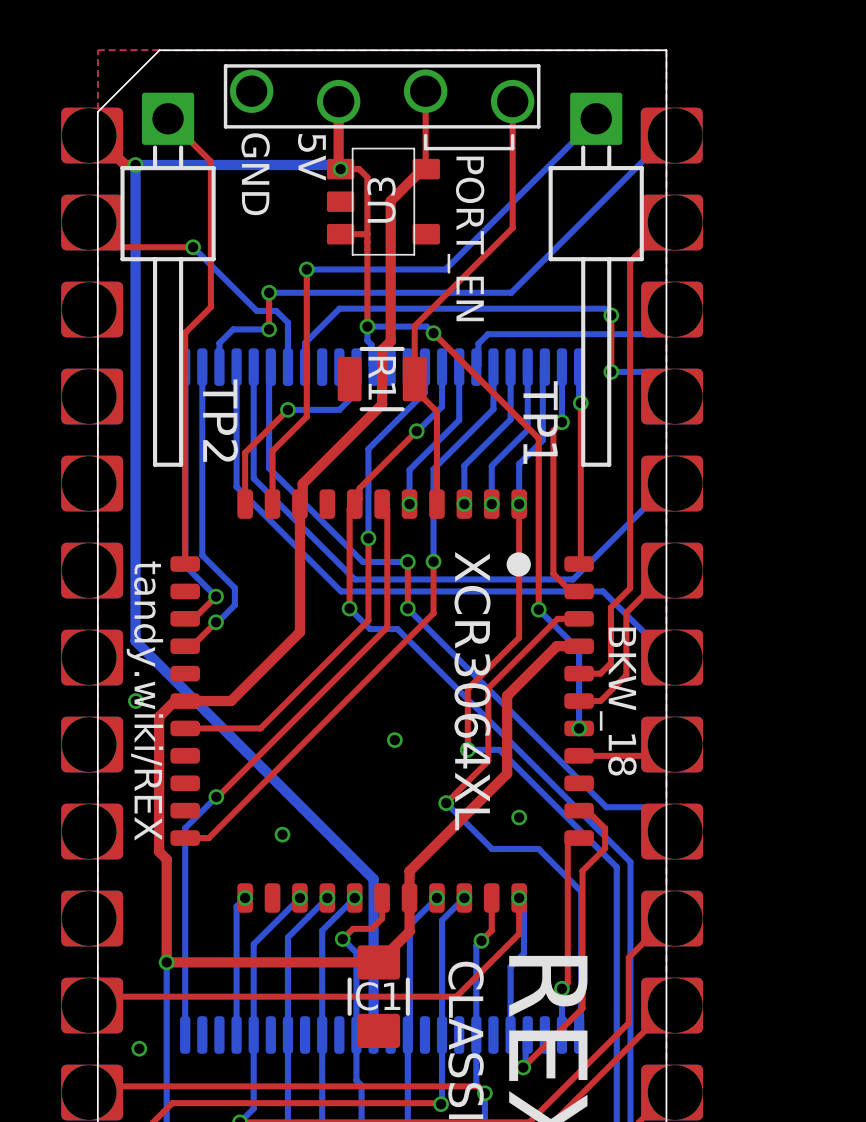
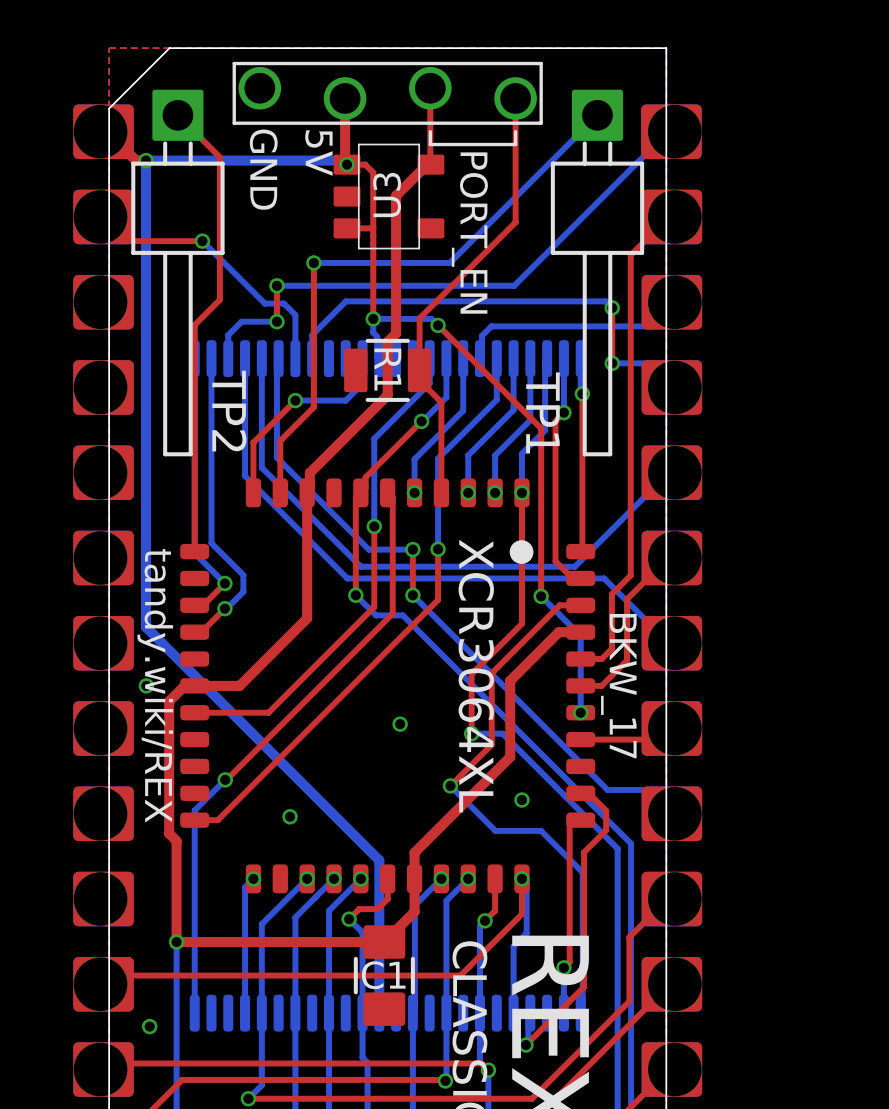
text: BKW_18 (618, 701) -> BKW_17 (618, 686)

